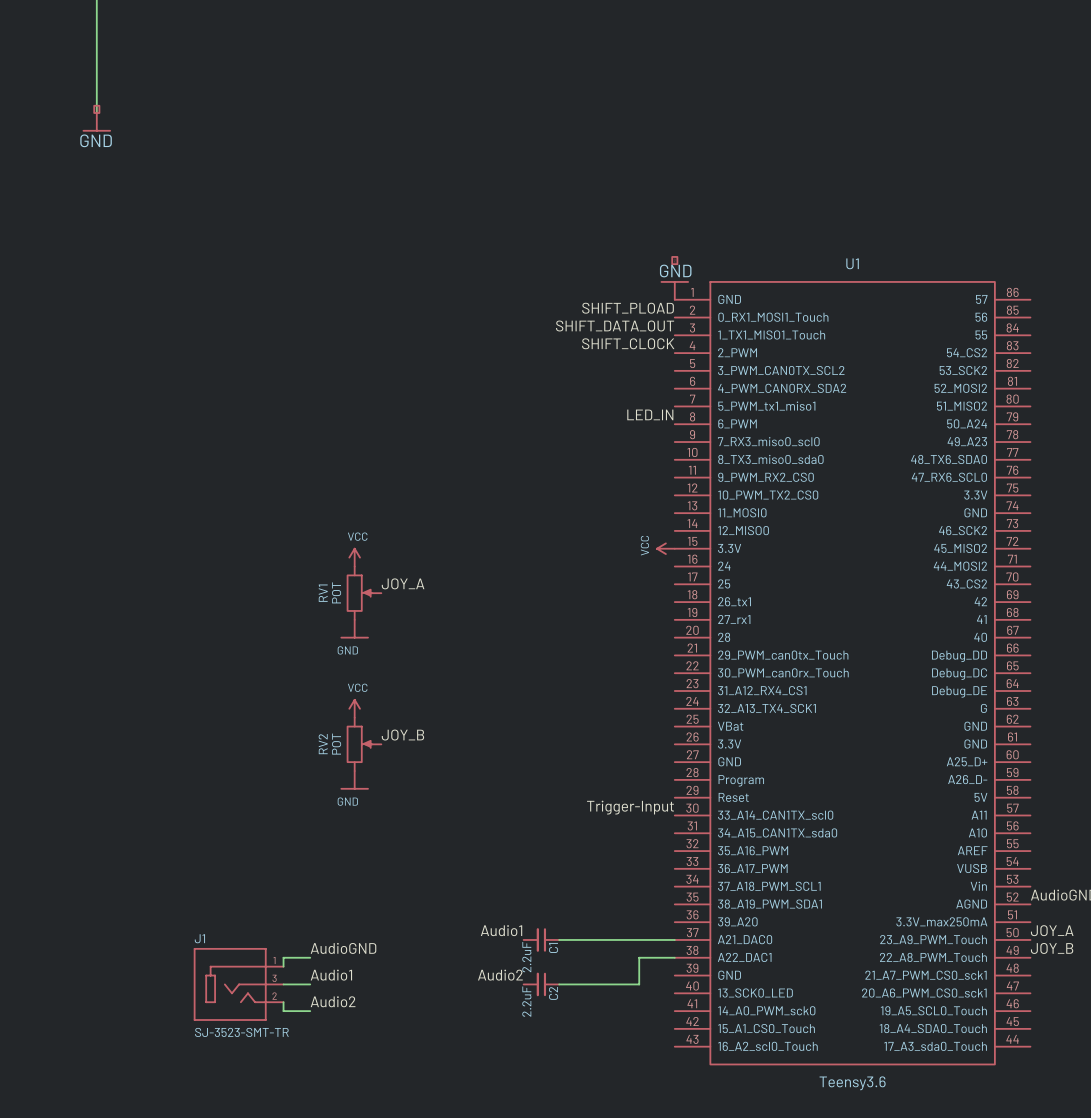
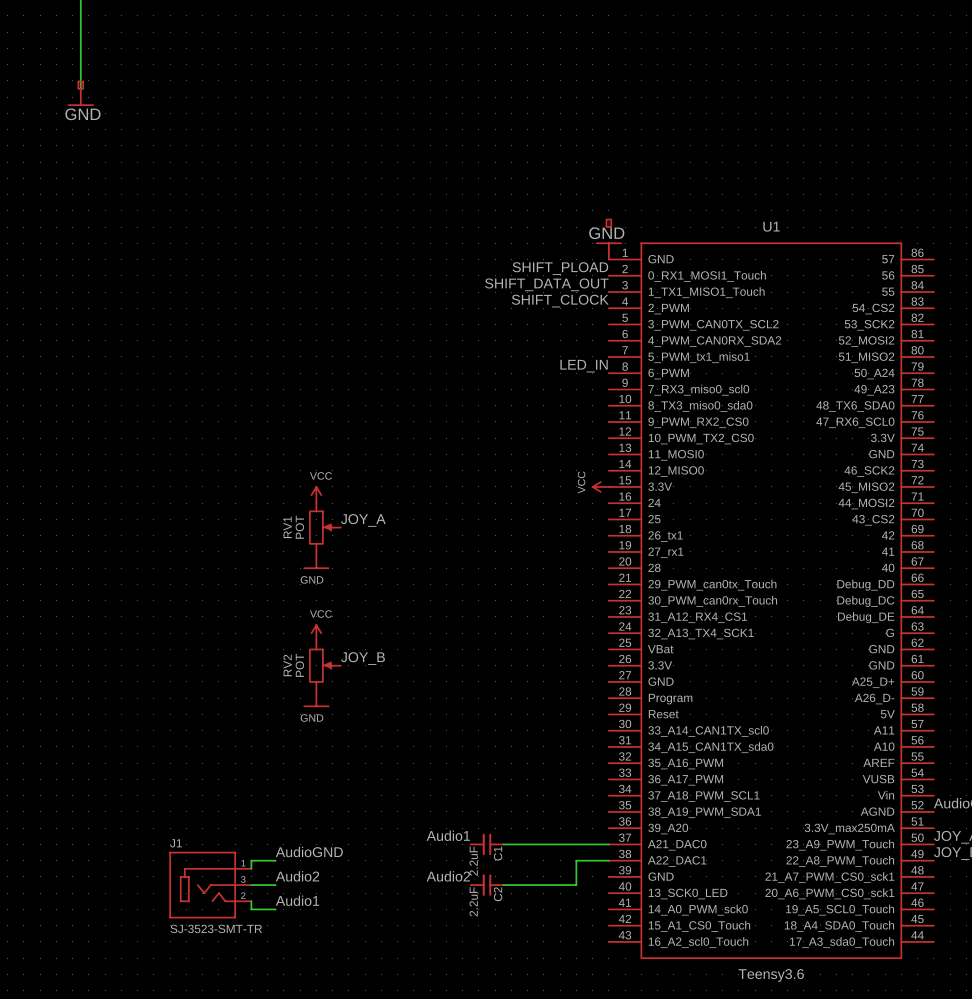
label: Trigger-Input (630, 807) -> none
label: Audio1 (331, 975) -> Audio2 (297, 876)
label: Audio2 (333, 1001) -> Audio1 (297, 900)

